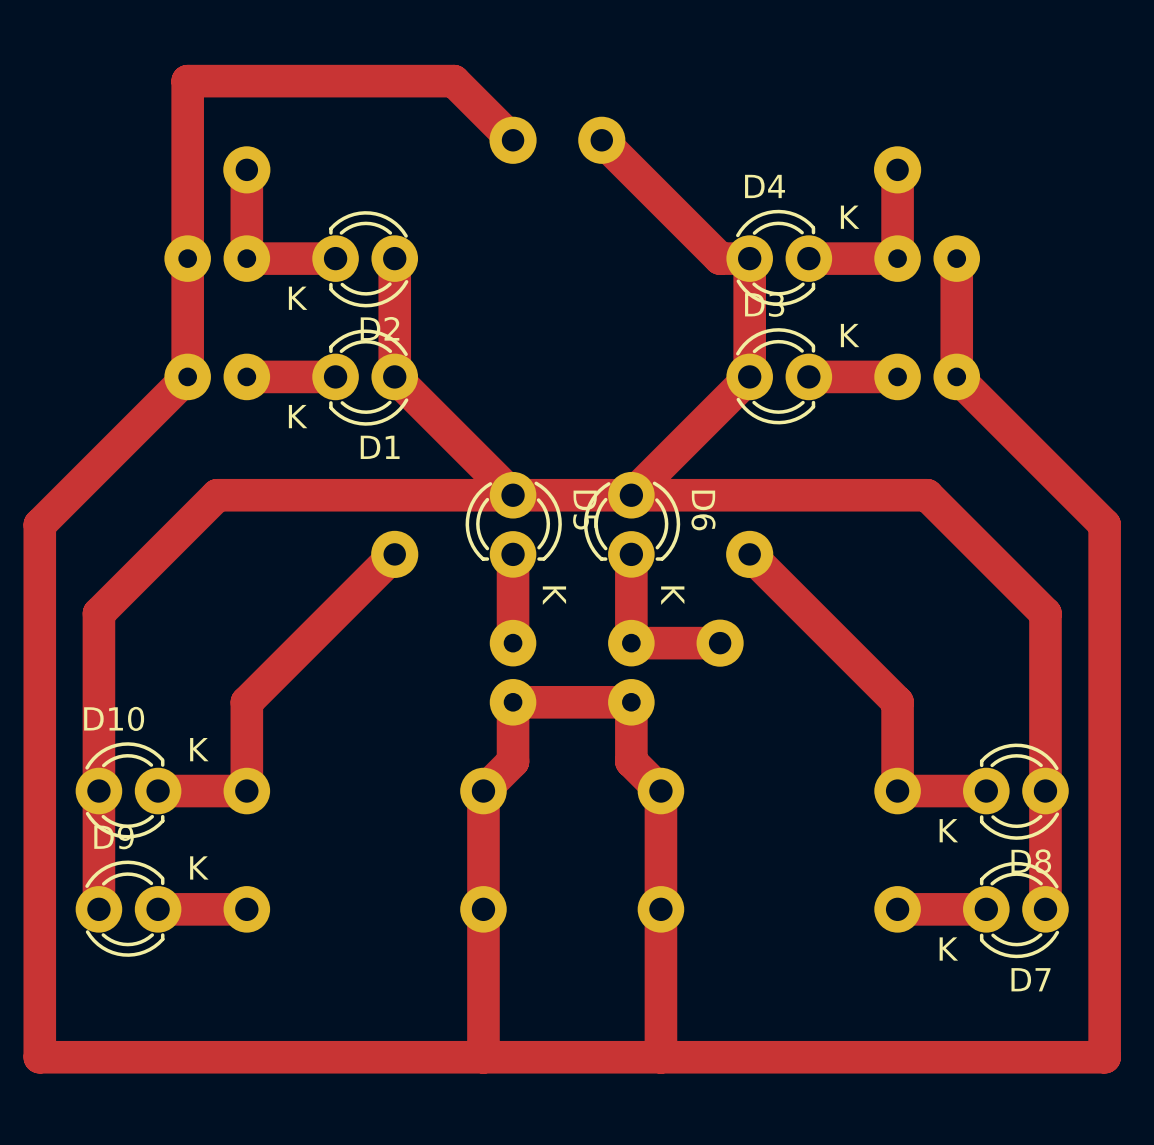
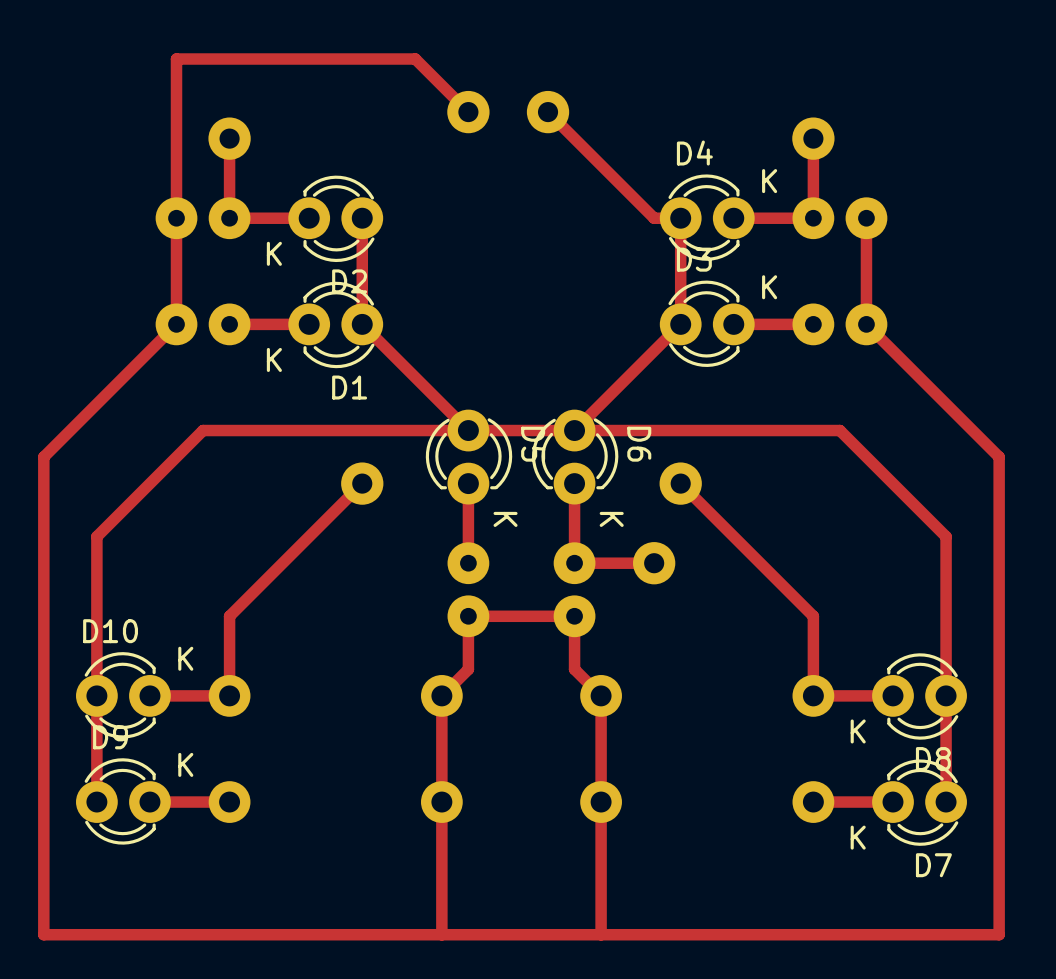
top track width: thick (513, 140) (453, 81) (187, 81) (187, 376) (39, 524) (39, 1057) (1104, 1057) (1104, 524) (956, 376) (956, 258) -> thin (468, 112) (415, 59) (176, 59) (176, 324) (43, 457) (43, 934) (999, 934) (999, 457) (866, 324) (866, 218)
top track width: thick (601, 140) (720, 258) (749, 258) (749, 376) (631, 495) -> thin (548, 112) (654, 218) (680, 218) (680, 324) (574, 430)
top track width: thick (246, 169) (246, 258) (335, 258) -> thin (229, 138) (229, 218) (309, 218)
top track width: thick (897, 169) (897, 258) (808, 258) -> thin (813, 138) (813, 218) (733, 218)
top track width: thick (394, 258) (394, 376) (513, 495) -> thin (362, 218) (362, 324) (468, 430)
top track width: thick (335, 376) (246, 376) -> thin (309, 324) (229, 324)
top track width: thick (897, 376) (808, 376) -> thin (813, 324) (733, 324)
top track width: thick (394, 554) (246, 702) (246, 791) (158, 791) -> thin (362, 483) (229, 616) (229, 695) (149, 695)
top track width: thick (513, 554) (513, 643) -> thin (468, 483) (468, 563)
top track width: thick (631, 554) (631, 643) (720, 643) -> thin (574, 483) (574, 563) (654, 563)
top track width: thick (749, 554) (897, 702) (897, 791) (986, 791) -> thin (680, 483) (813, 616) (813, 695) (893, 695)
top track width: thick (246, 909) (158, 909) -> thin (229, 802) (149, 802)
top track width: thick (986, 909) (897, 909) -> thin (893, 802) (813, 802)
top track width: thick (1045, 909) (1045, 613) (927, 495) (217, 495) (98, 613) (98, 909) -> thin (946, 802) (946, 536) (839, 430) (203, 430) (96, 536) (96, 802)
top track width: thick (660, 1057) (660, 791) (631, 761) (631, 702) (513, 702) (513, 761) (483, 791) (483, 1057) -> thin (601, 934) (601, 695) (574, 669) (574, 616) (468, 616) (468, 669) (441, 695) (441, 934)

